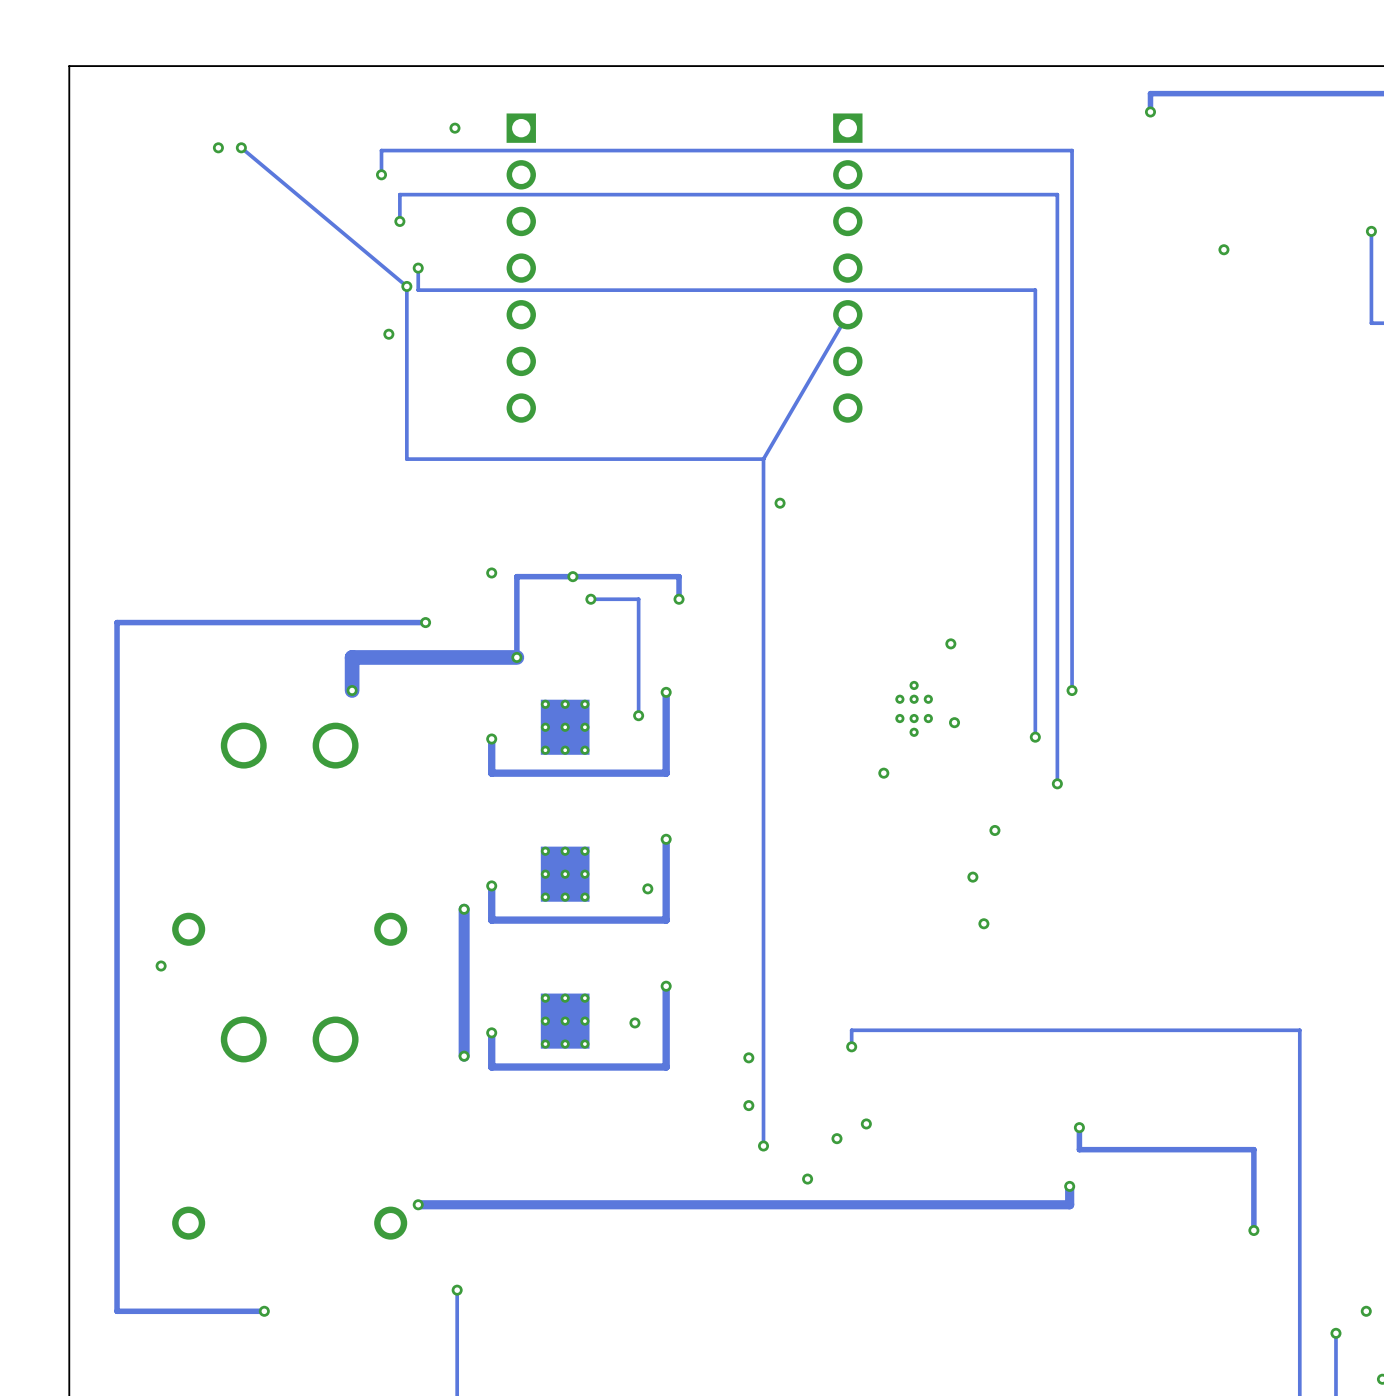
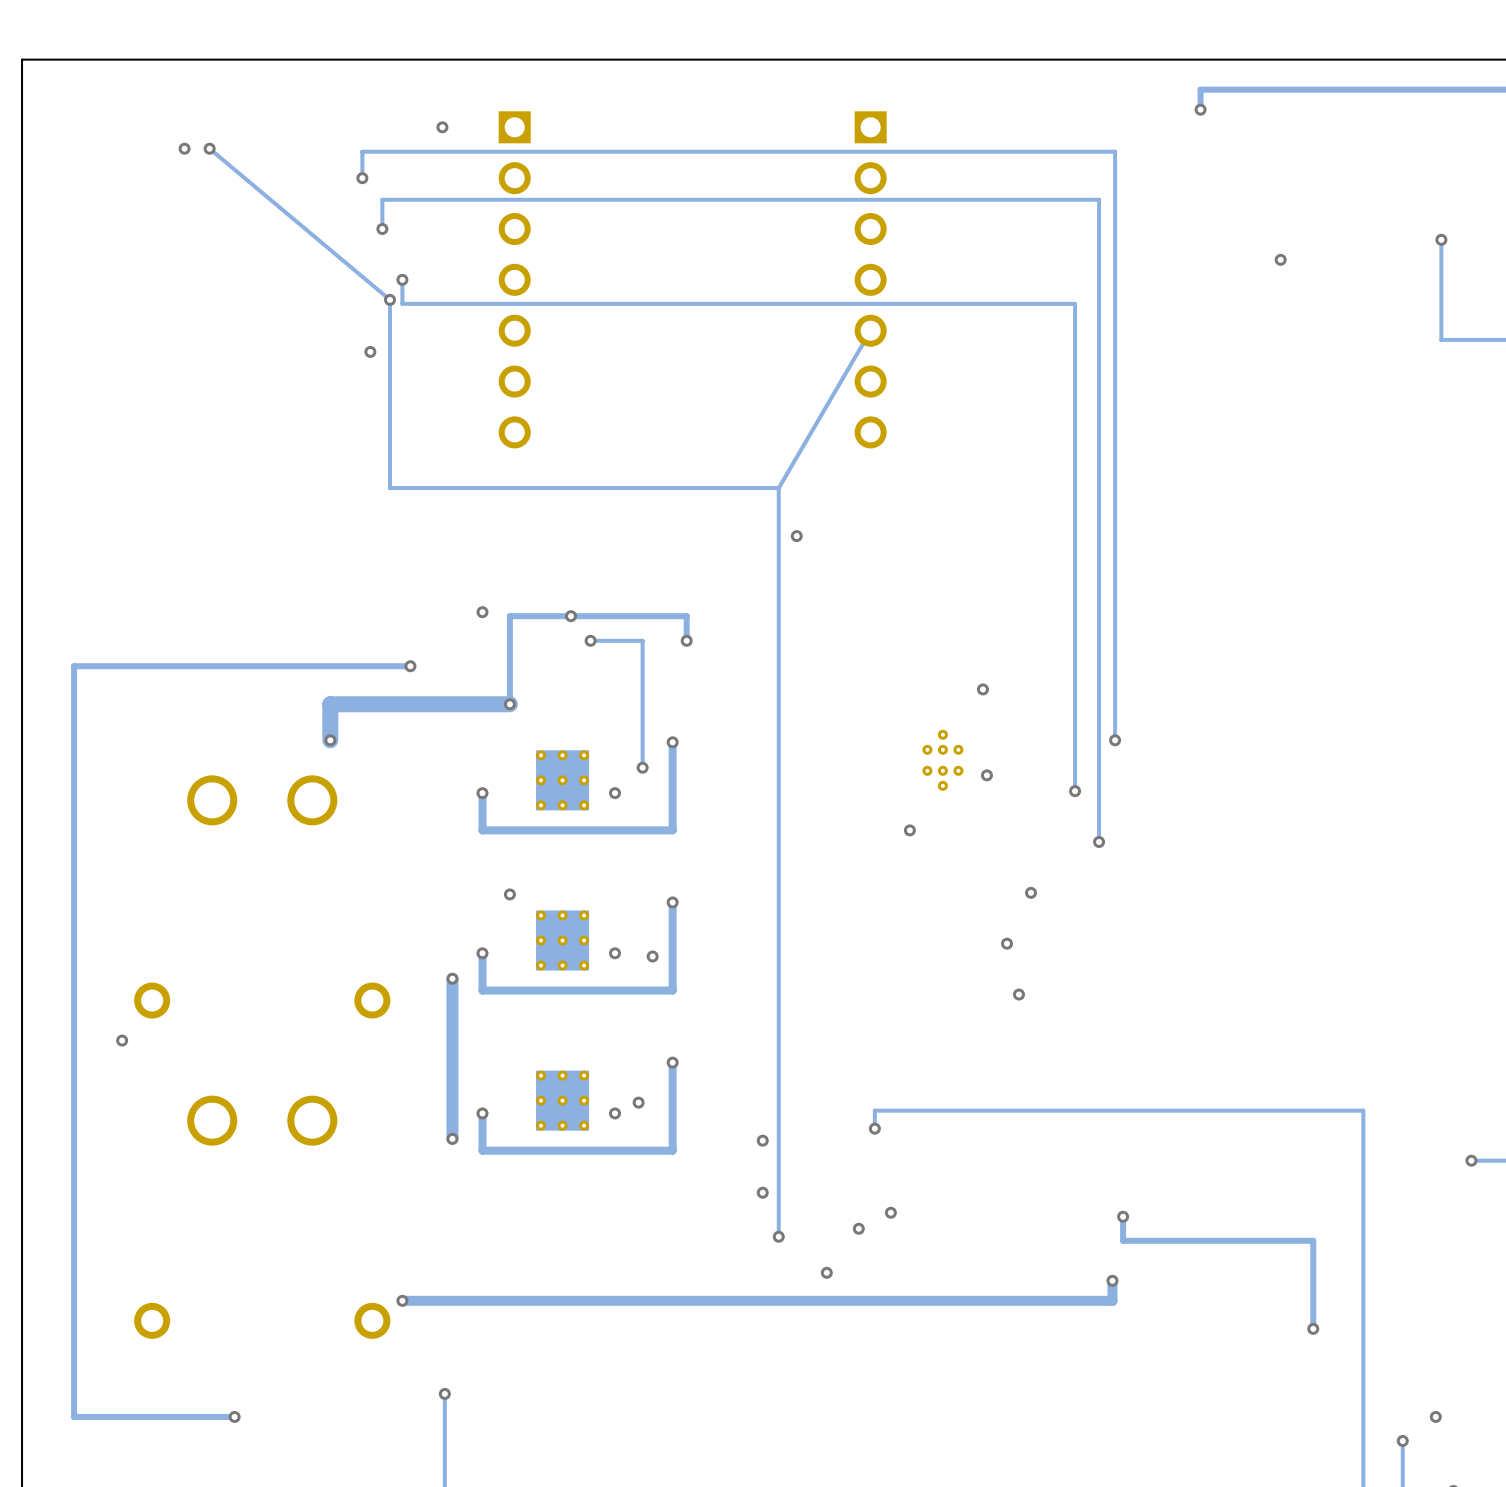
via: none -> (615, 793)
via: none -> (509, 894)
via: none -> (615, 953)
via: none -> (615, 1113)

